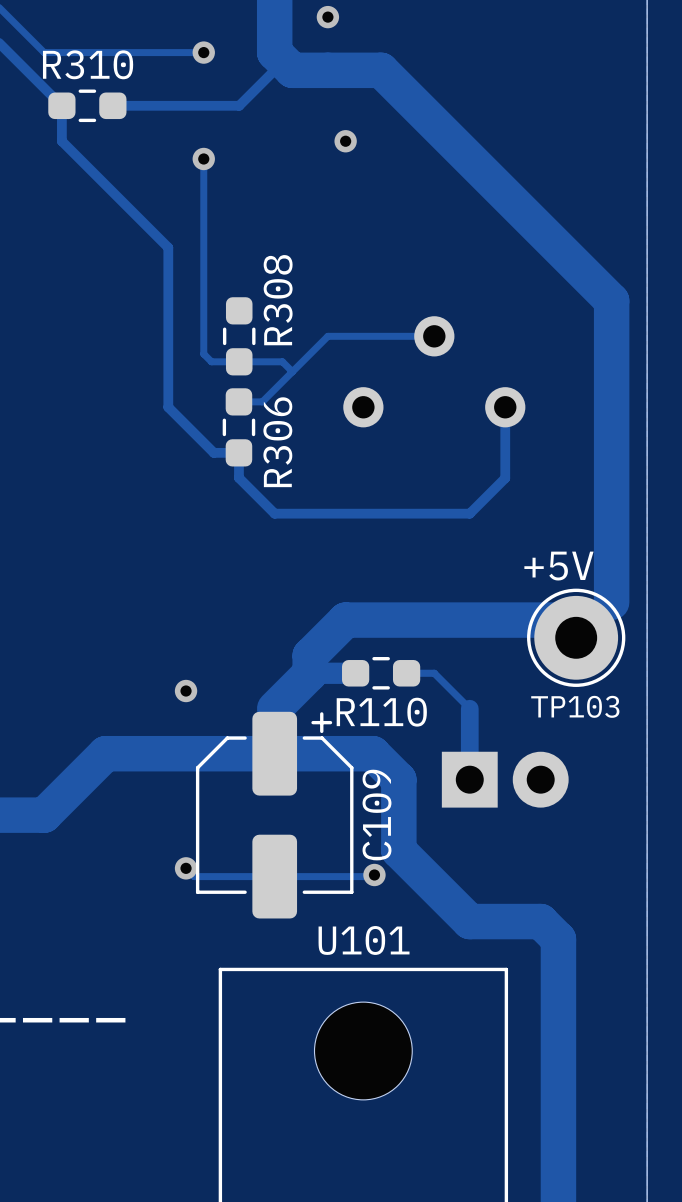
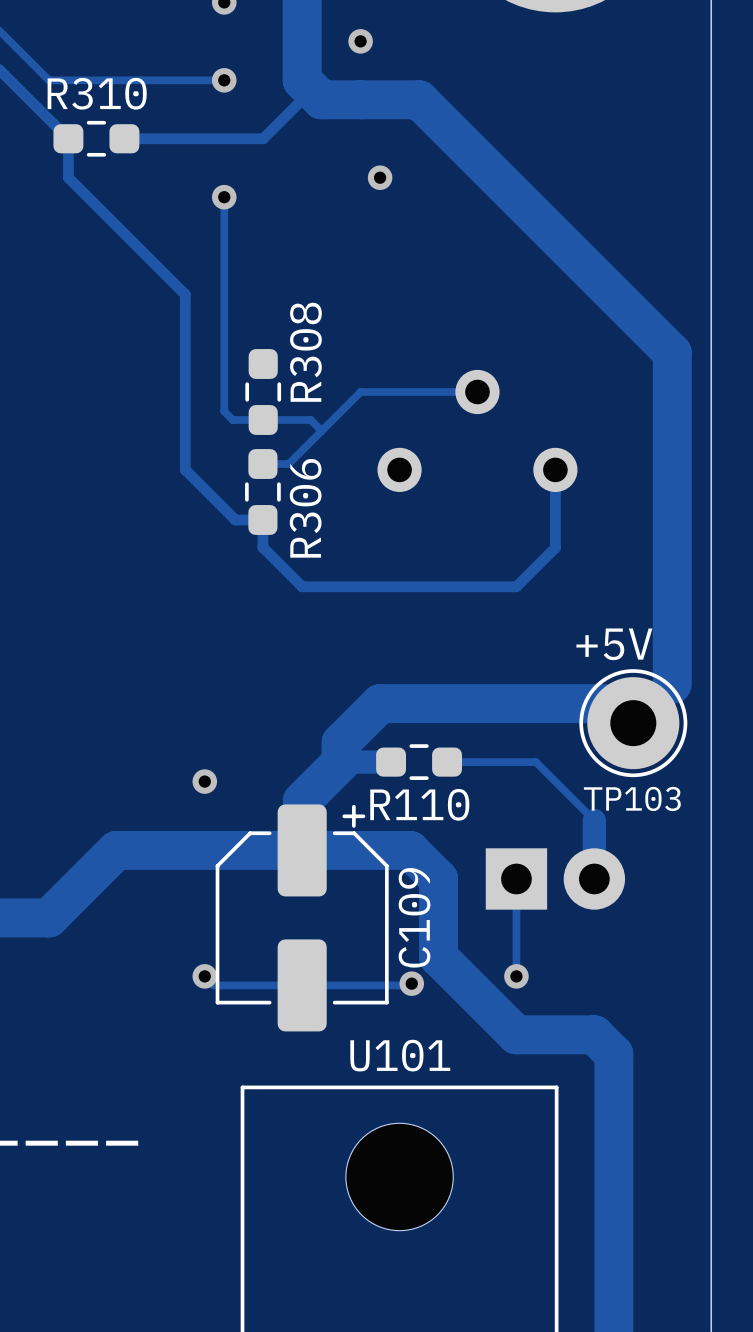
track: (434, 673) (469, 708) (469, 779) -> (477, 762) (535, 762) (594, 820) (594, 878)
track: none -> (516, 878) (516, 976)
via: none -> (516, 976)

